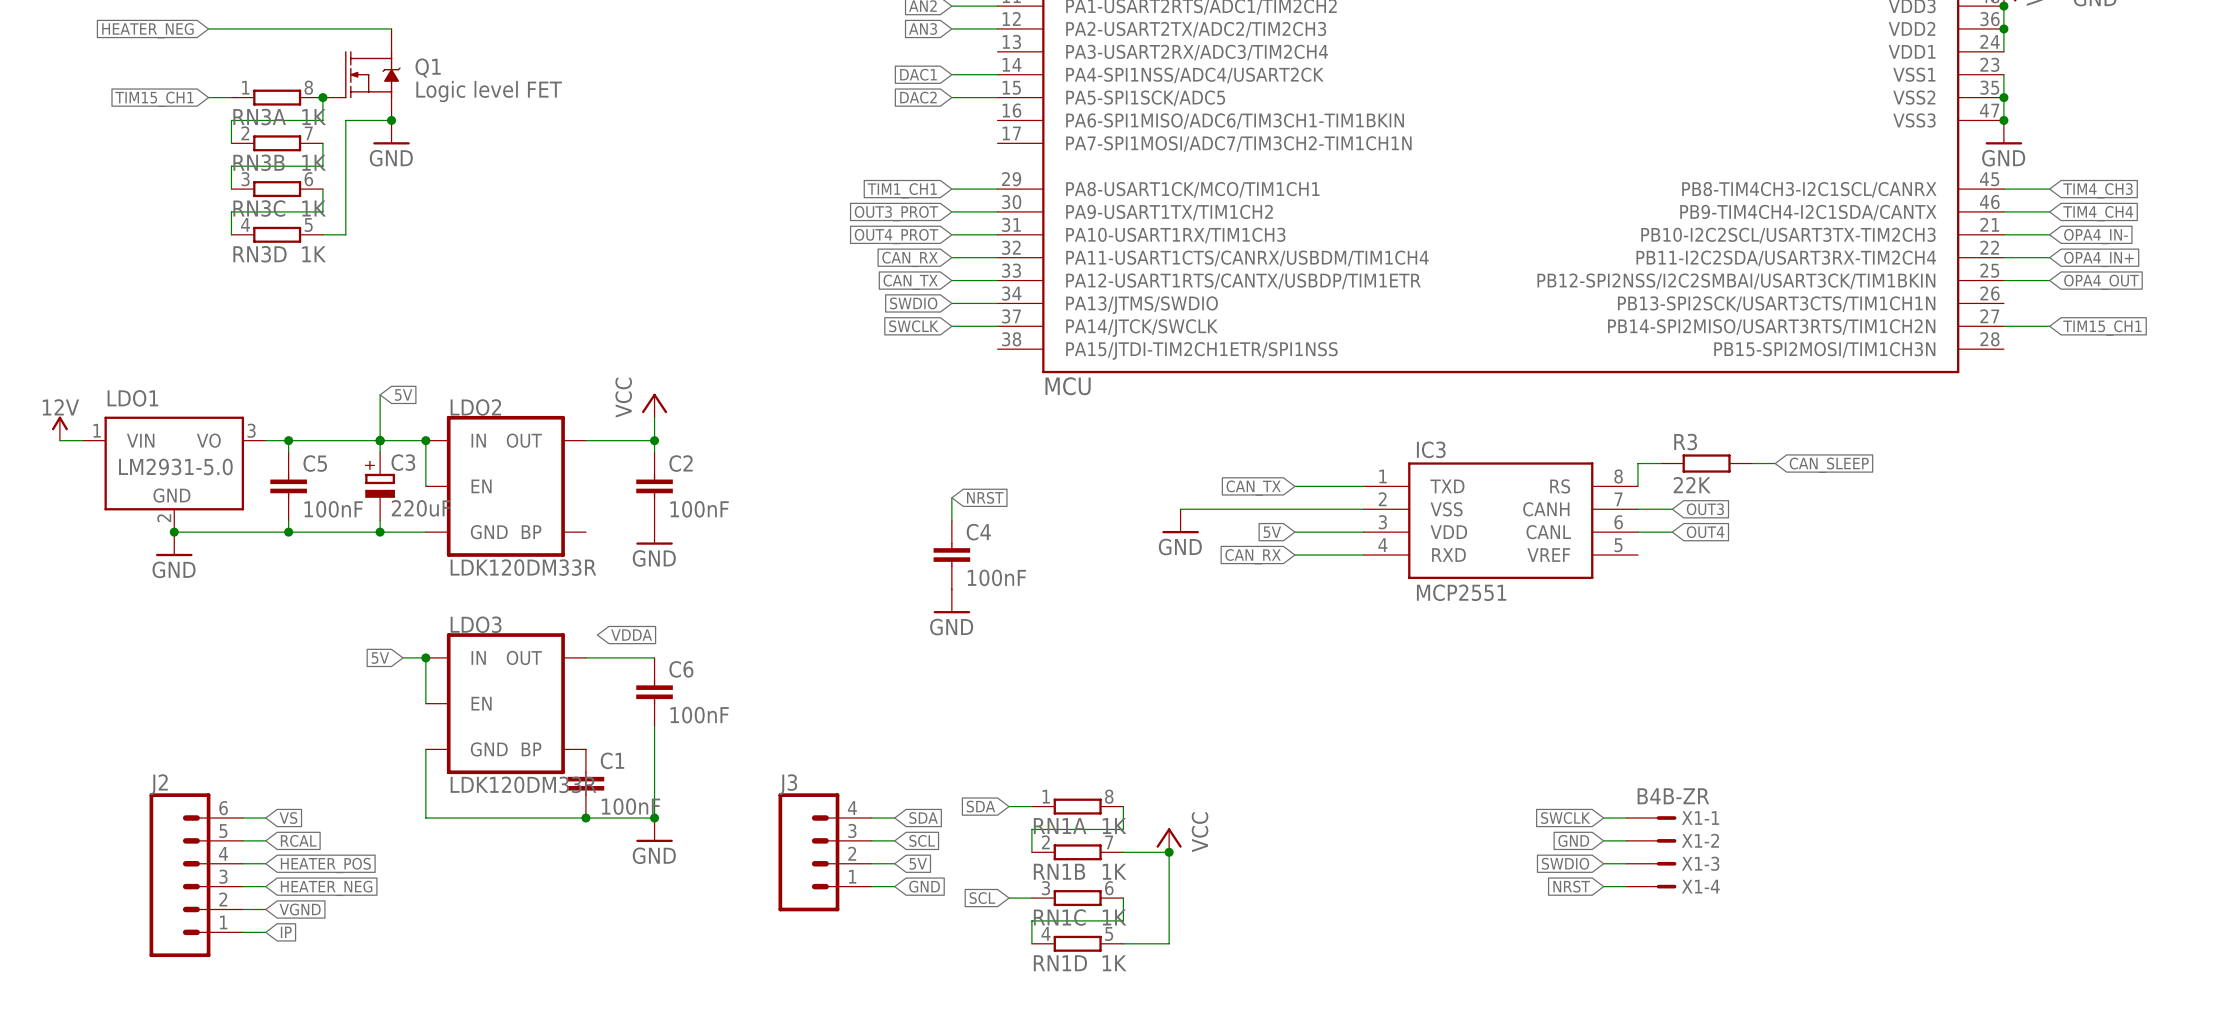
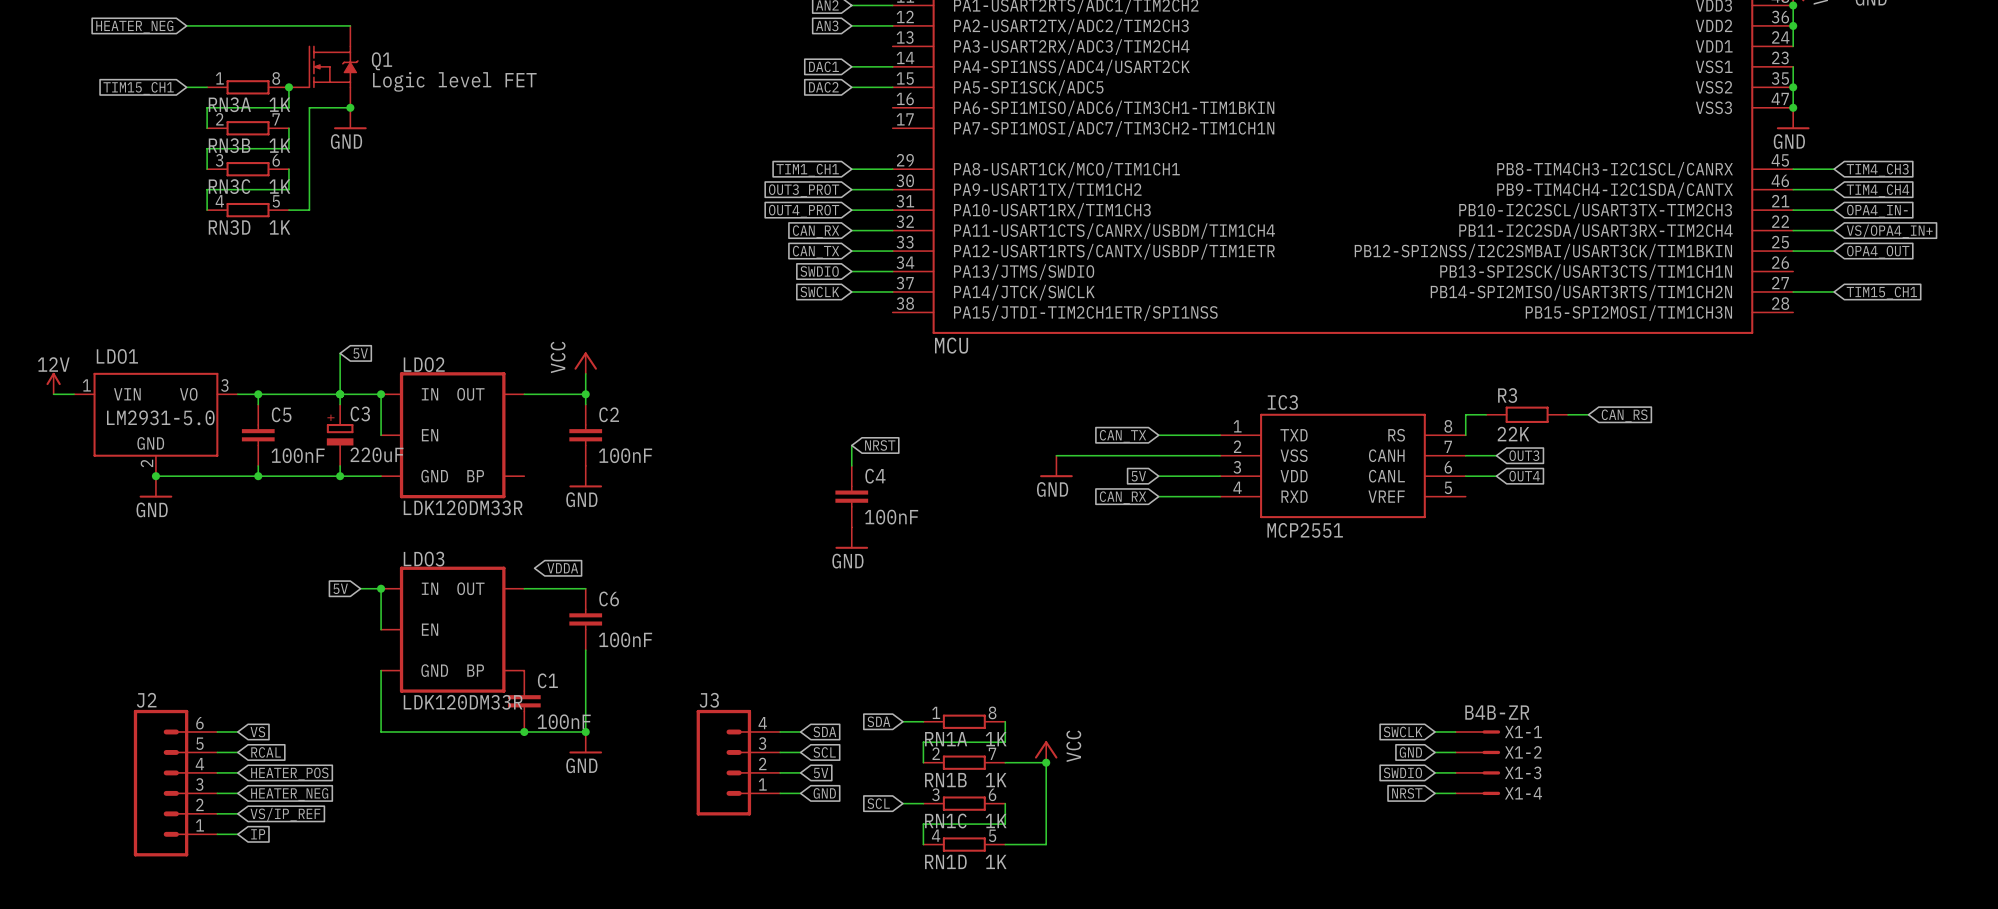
global label: OPA4_IN+ (2098, 259) -> VS/OPA4_IN+ (1889, 231)
global label: CAN_SLEEP (1829, 465) -> CAN_RS (1624, 415)
global label: VGND (300, 909) -> VS/IP_REF (285, 814)

